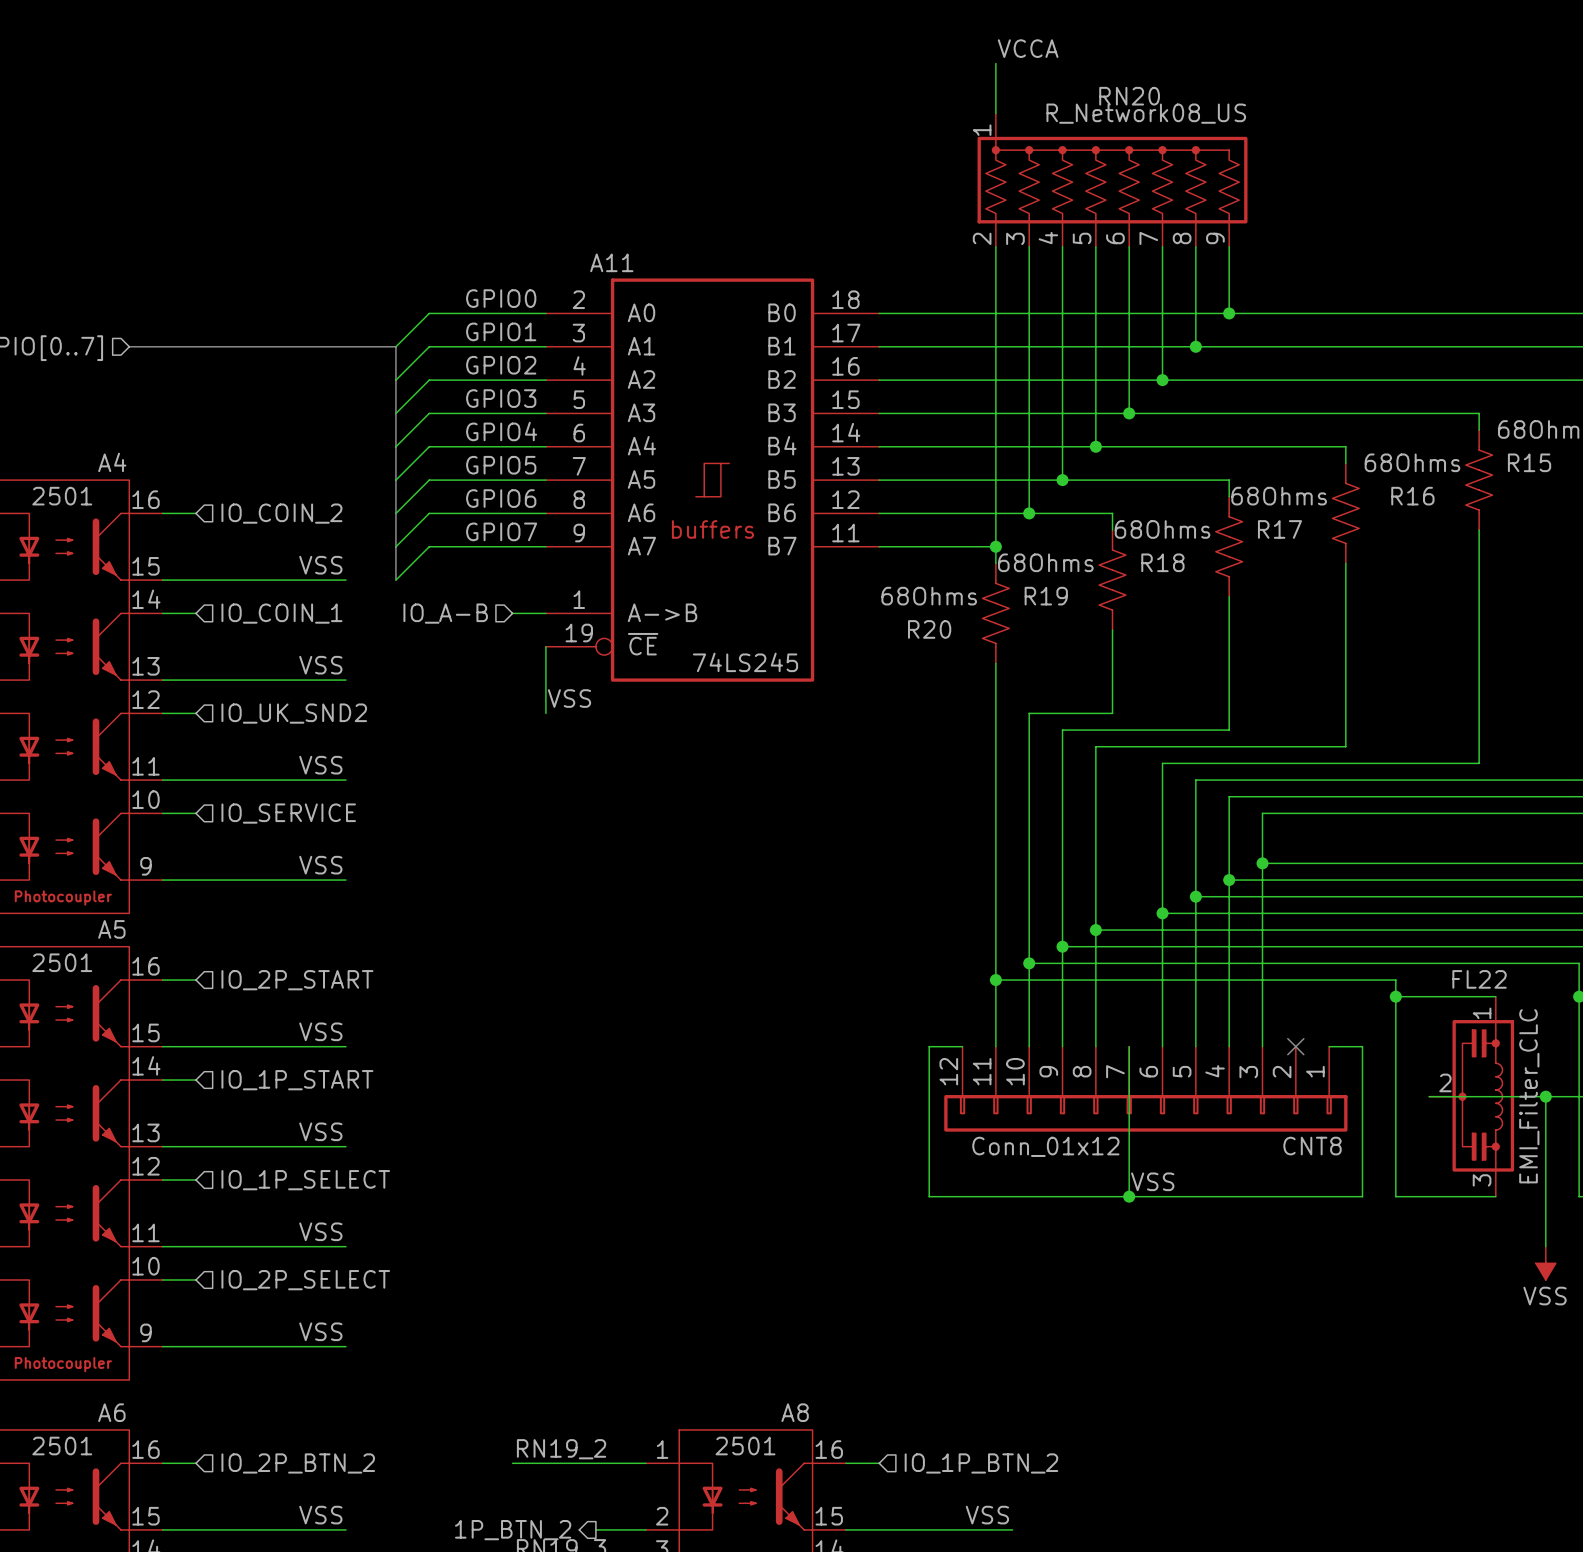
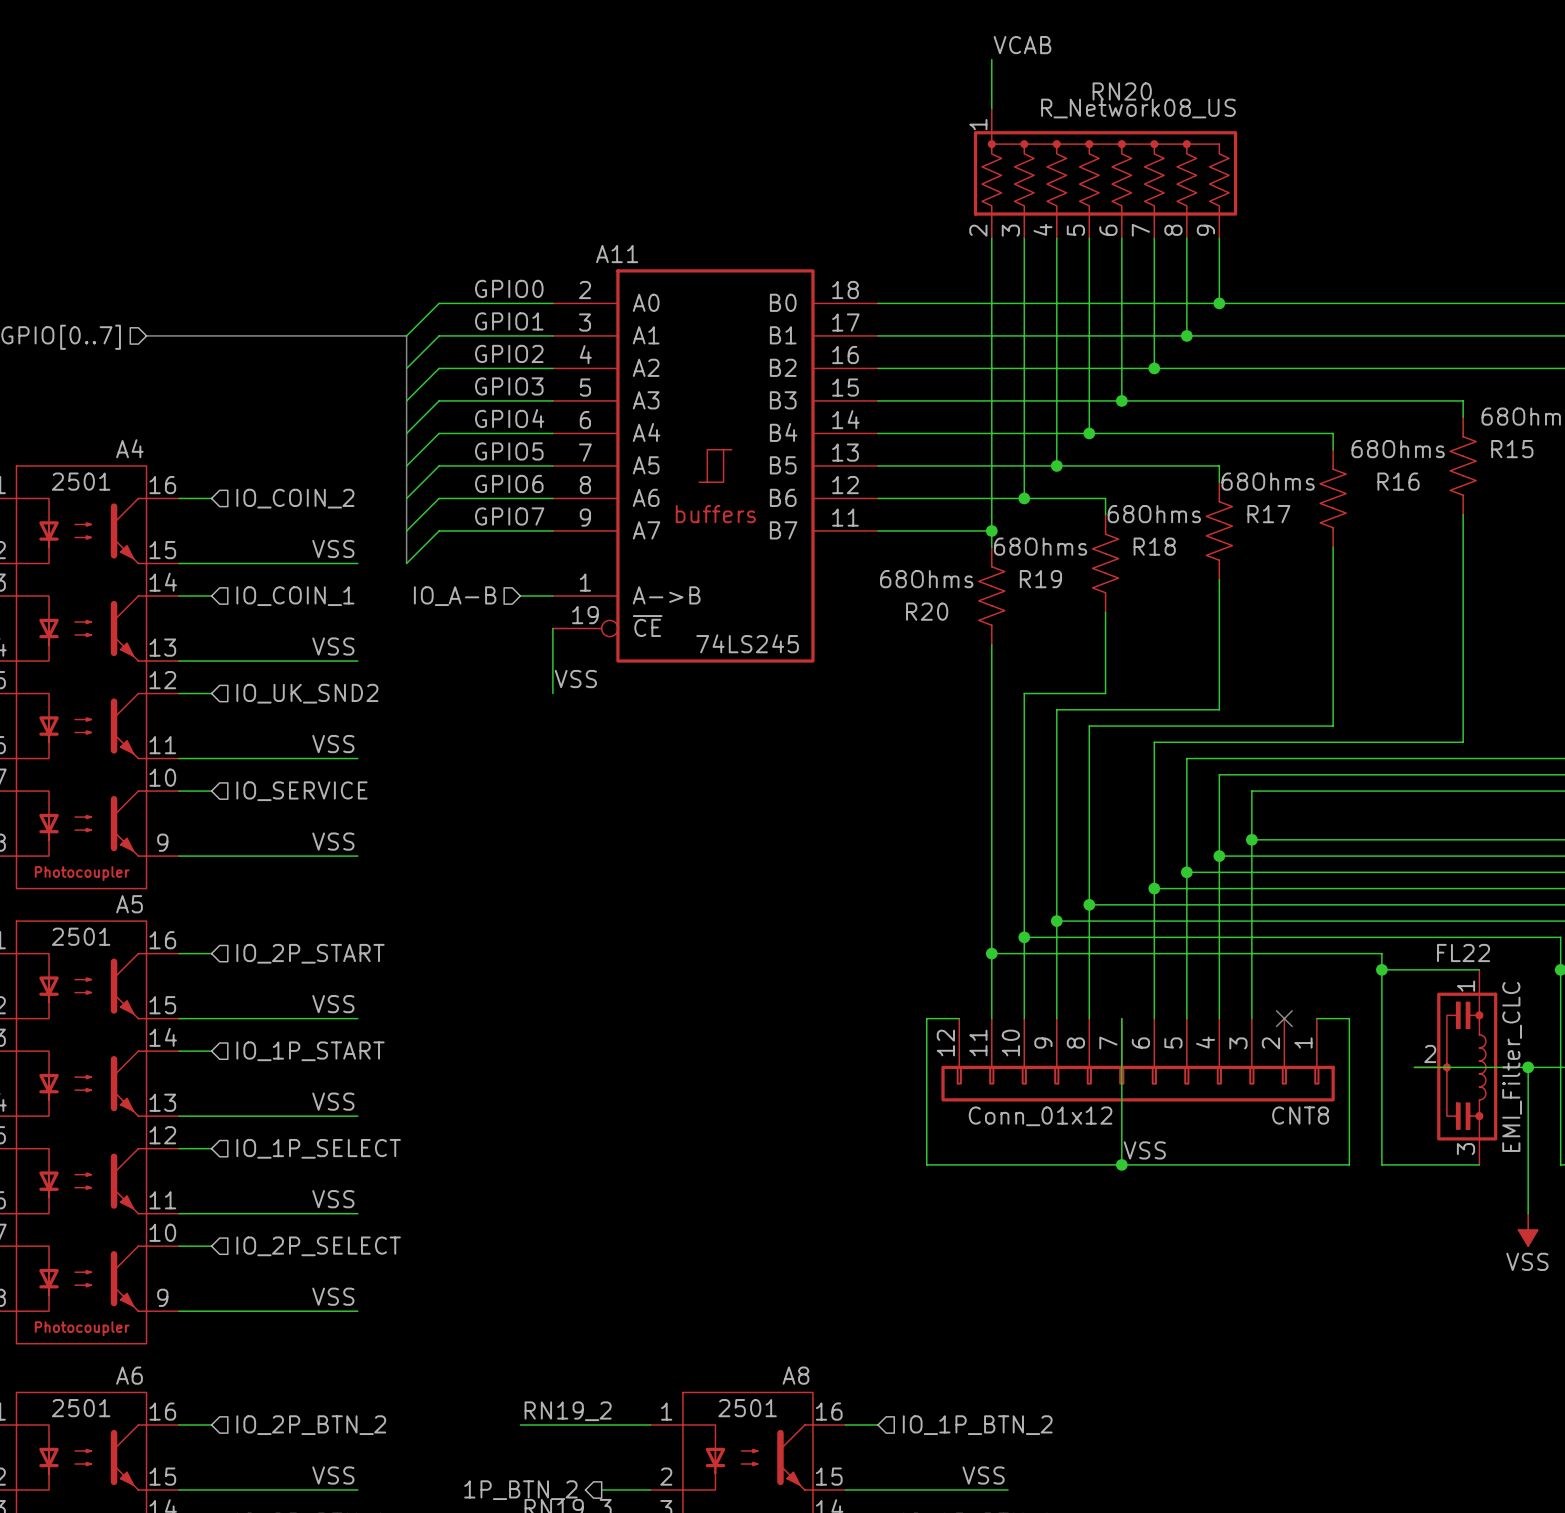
label: VCCA (1028, 48) -> VCAB (1022, 45)

